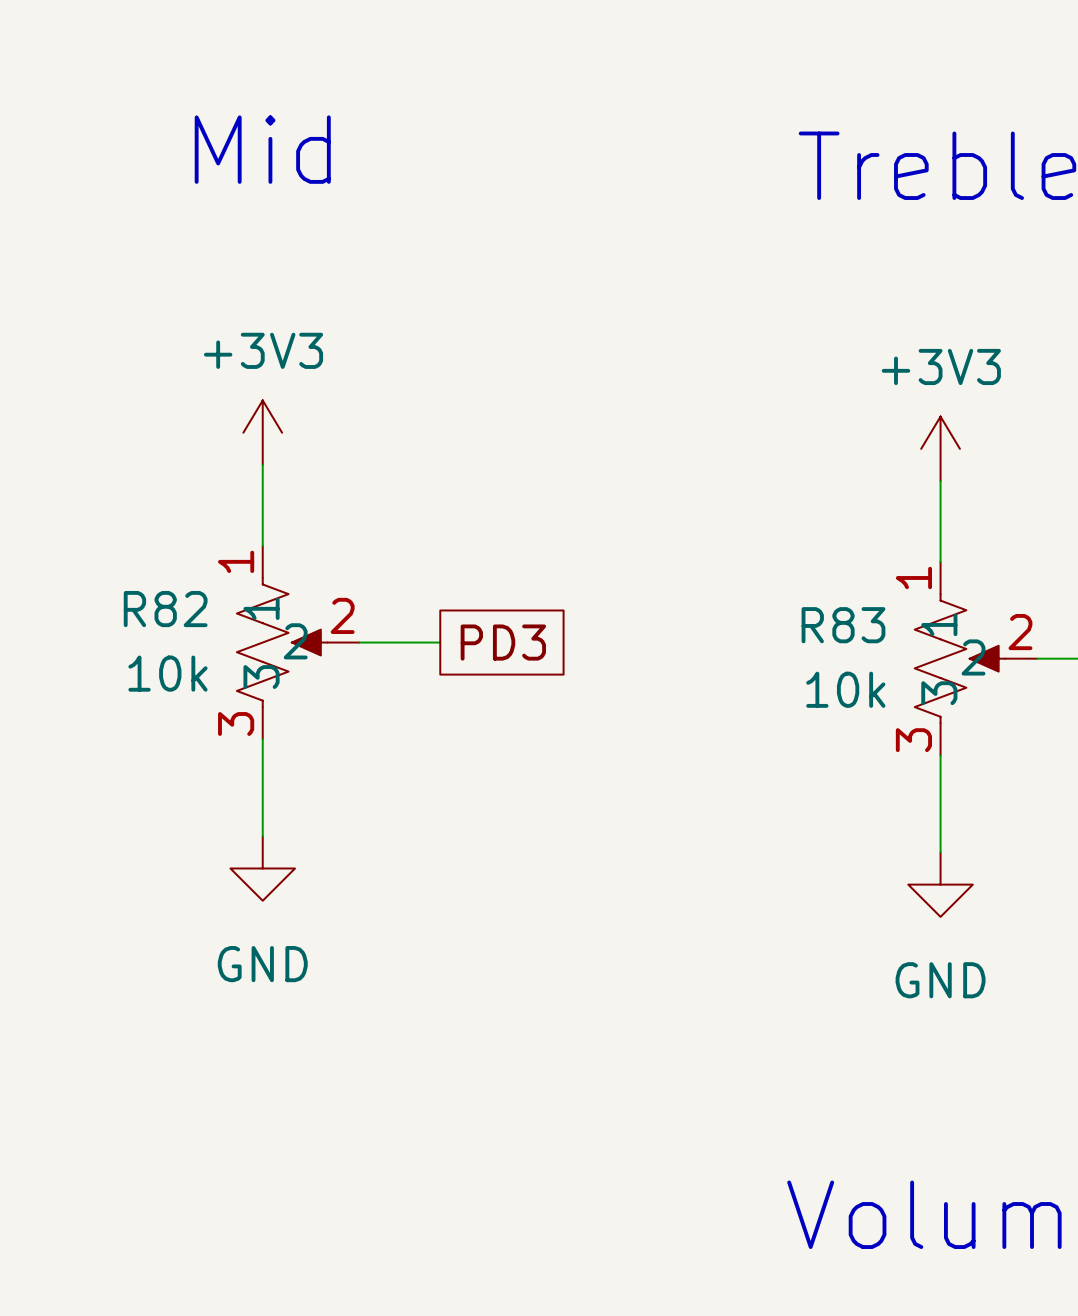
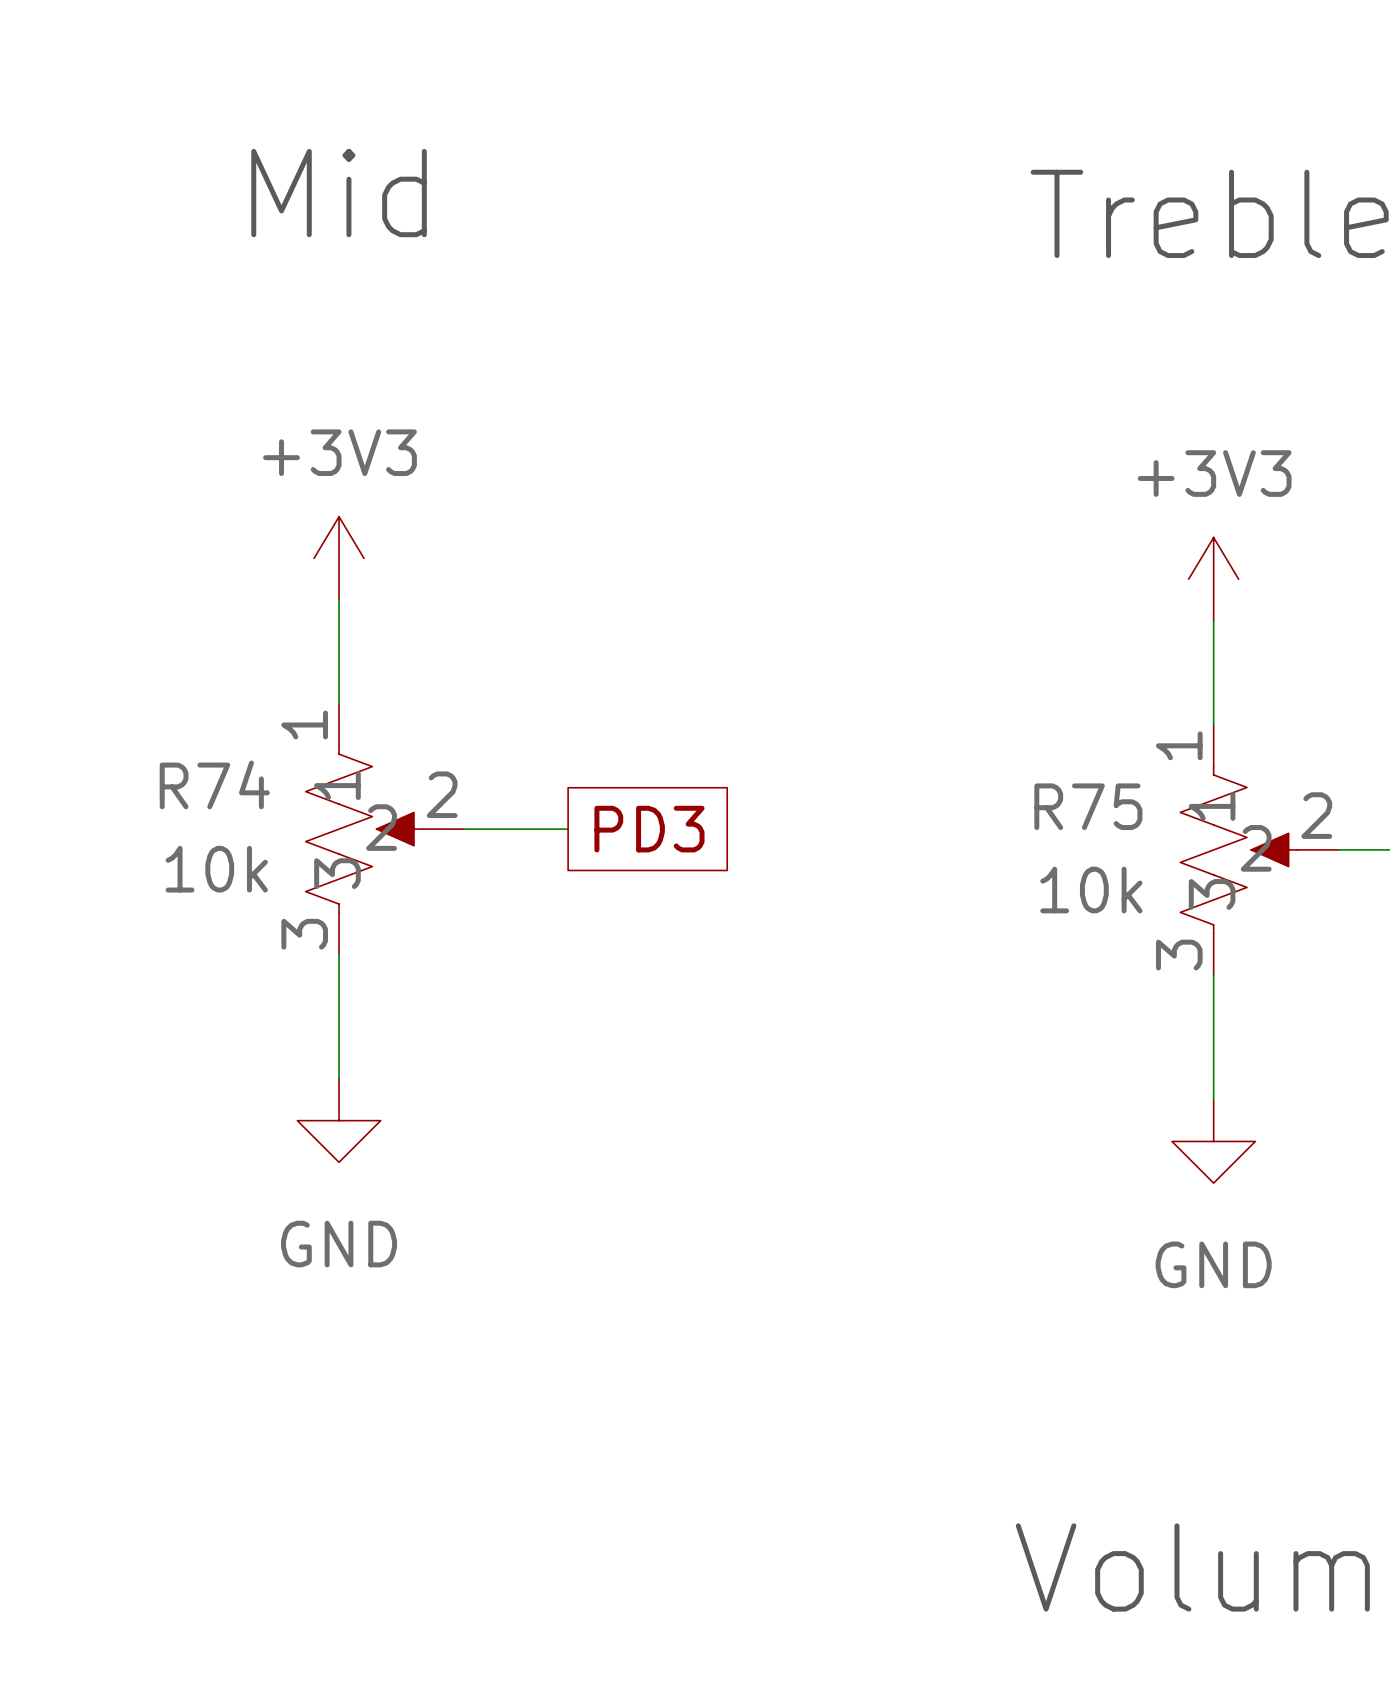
R82 name: R82 (165, 609) -> R74 (214, 784)
R83 name: R83 (843, 625) -> R75 (1088, 806)

